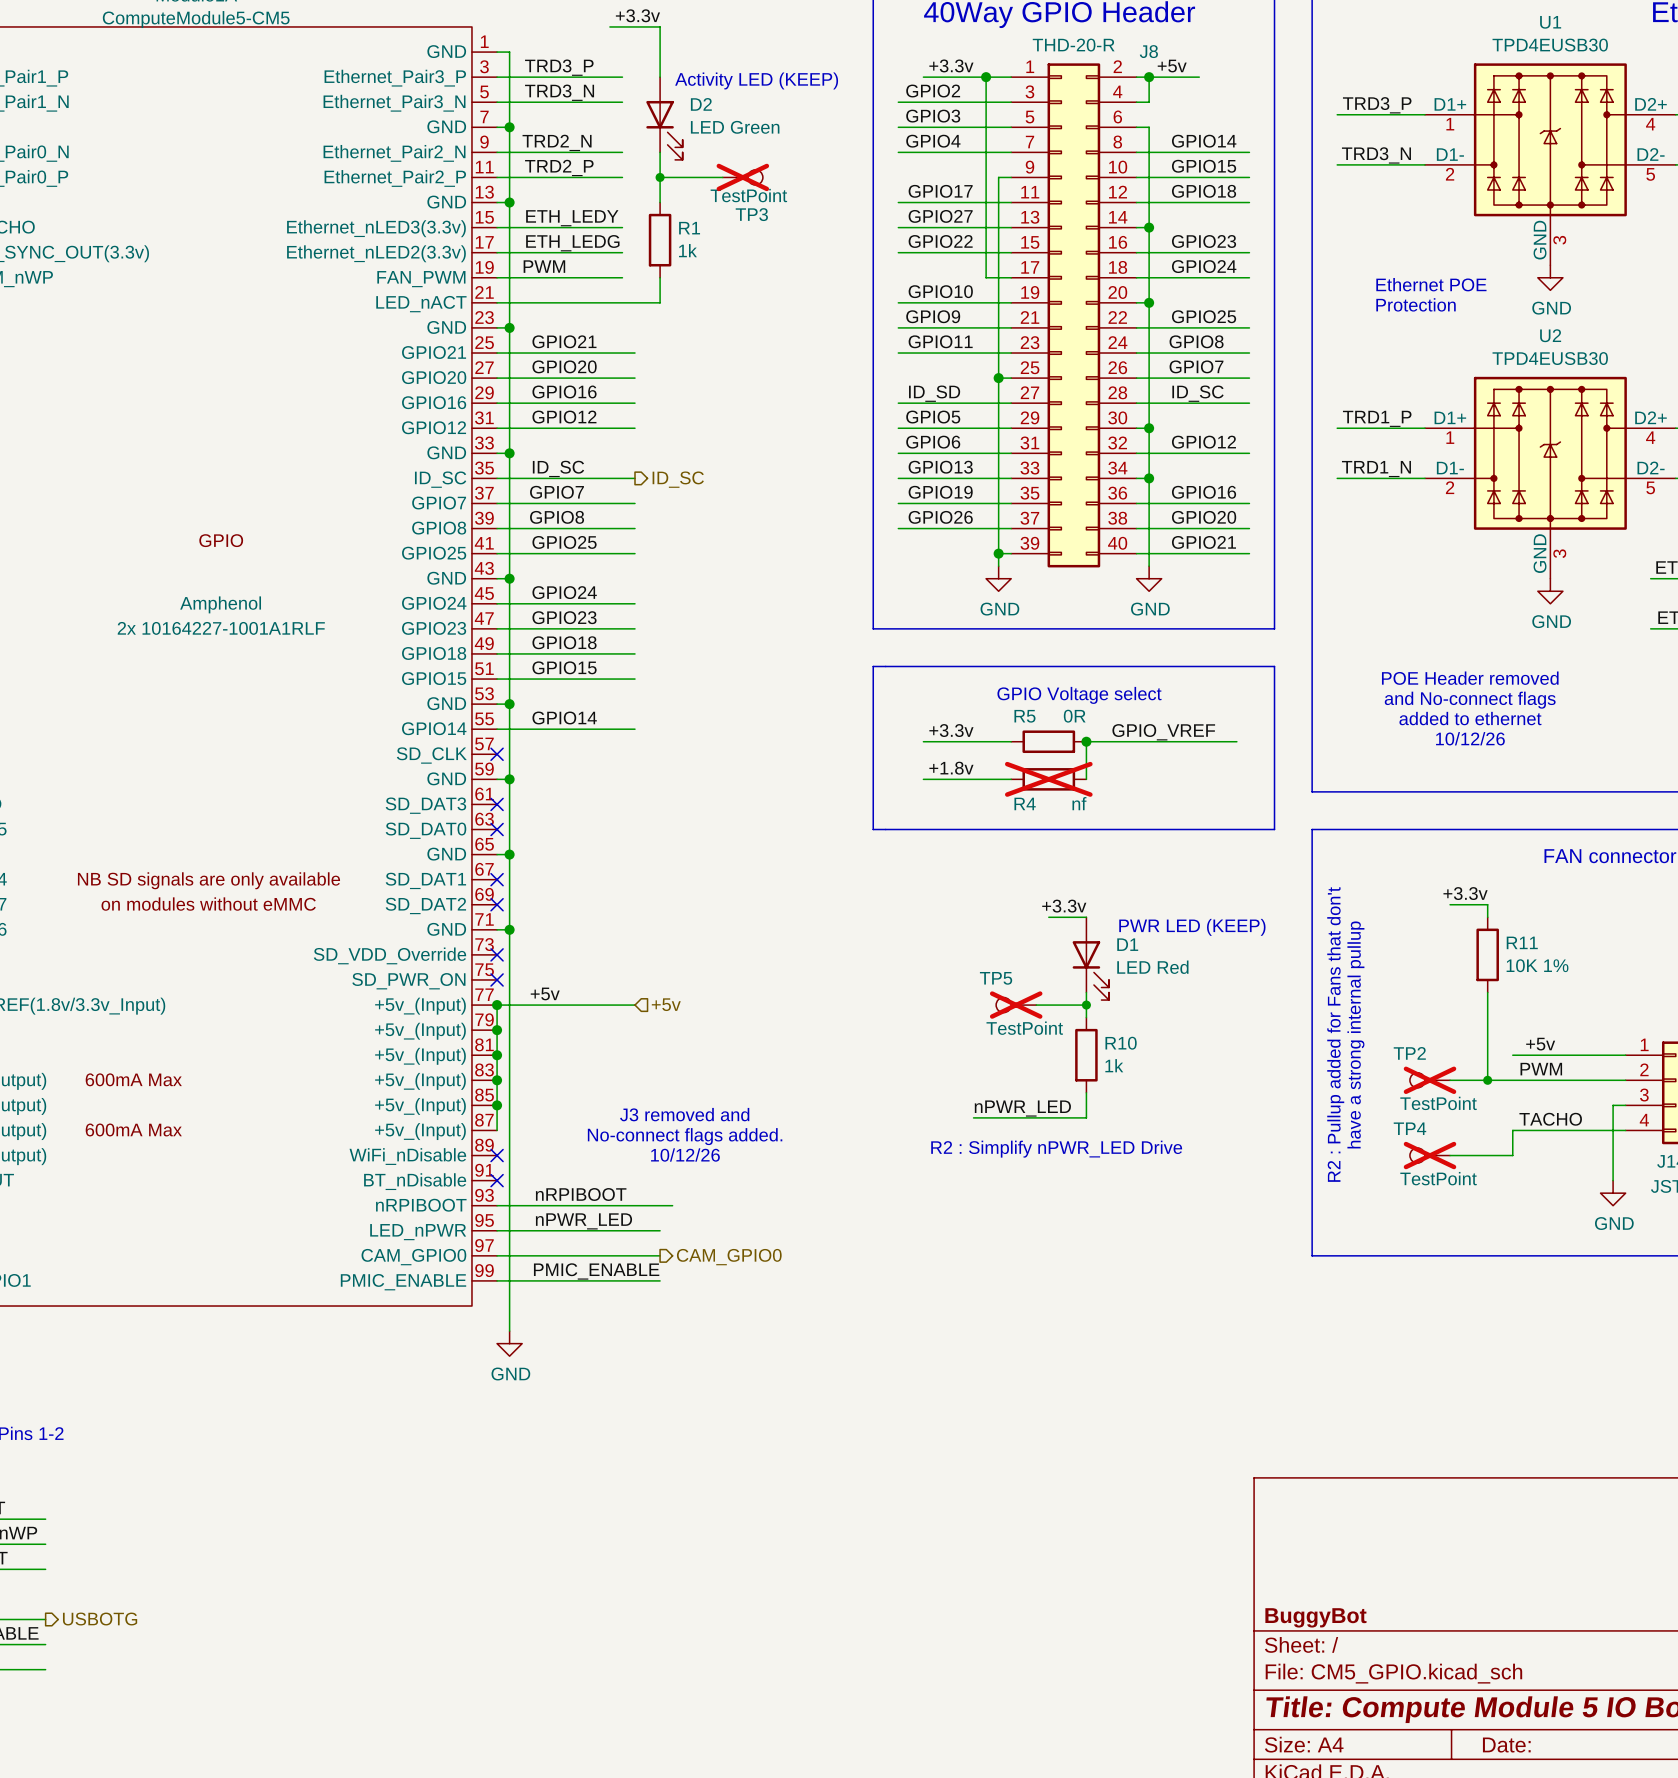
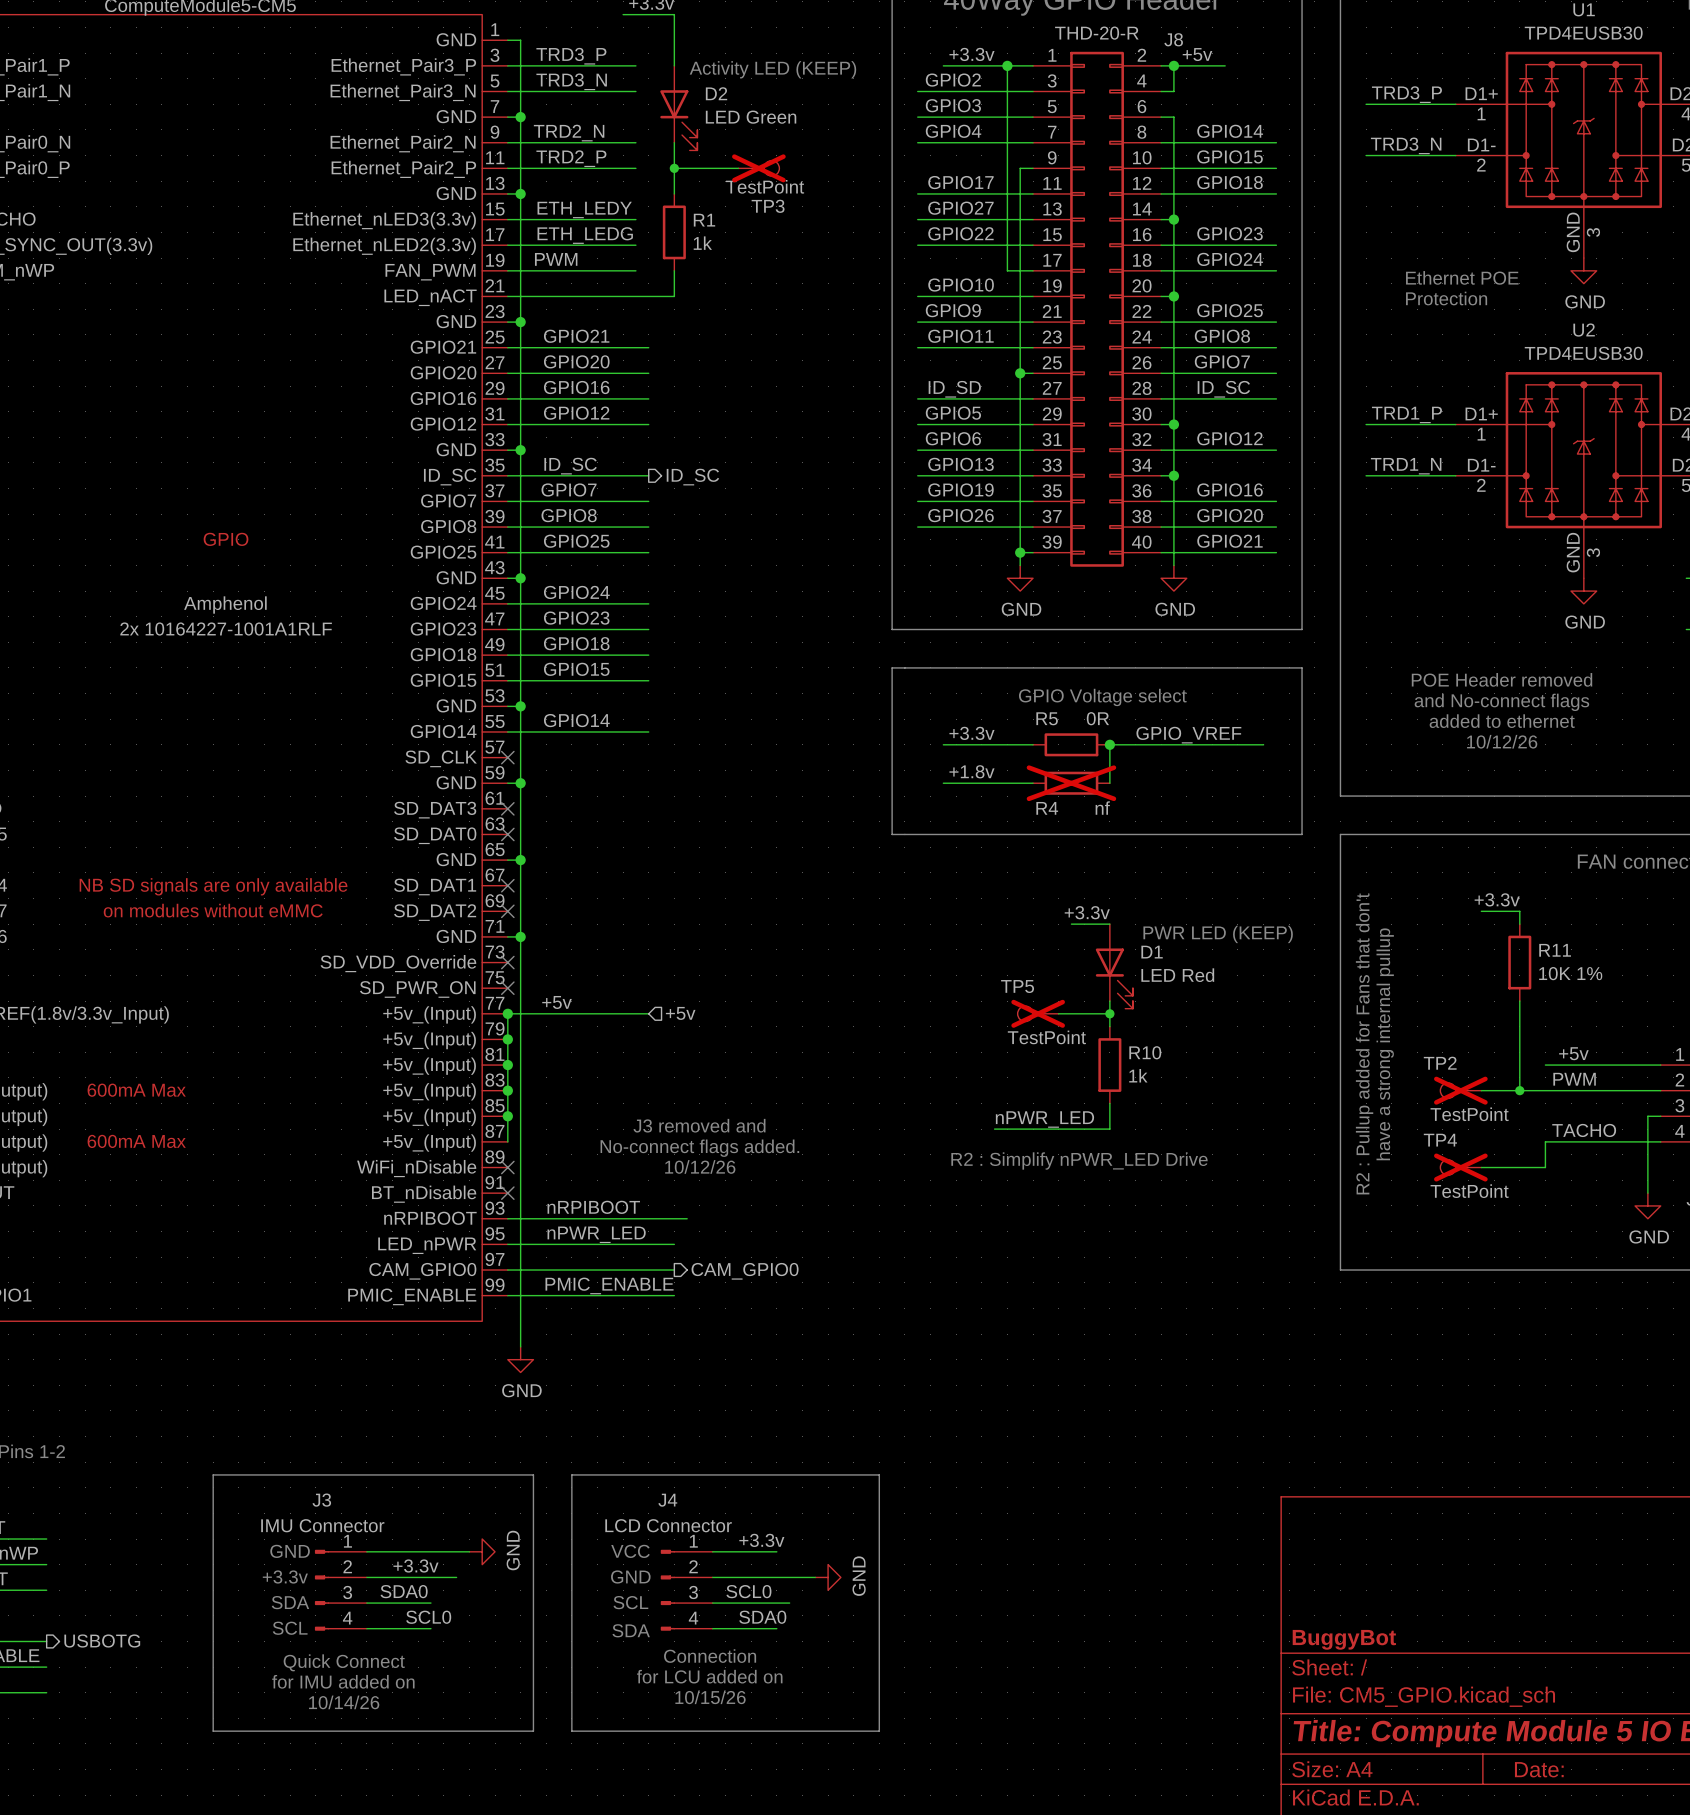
line: none -> (213, 1474) (533, 1474) (533, 1731) (213, 1731) (213, 1474)
line: none -> (571, 1474) (879, 1474) (879, 1731) (571, 1731) (571, 1474)
label: none -> +3.3v (761, 1540)
text: none -> GND (290, 1551)
wire: none -> (366, 1551) (469, 1551)
power symbol: none -> GND (482, 1551)
text: none -> VCC (630, 1551)
wire: none -> (712, 1551) (776, 1551)
label: none -> +3.3v (415, 1566)
text: none -> +3.3v (285, 1576)
wire: none -> (366, 1577) (456, 1577)
text: none -> GND (630, 1576)
wire: none -> (712, 1577) (815, 1577)
power symbol: none -> GND (828, 1577)
J3: none -> IMU Connector (340, 1590)
J4: none -> LCD Connector (686, 1590)
label: none -> SDA0 (404, 1591)
label: none -> SCL0 (748, 1591)
text: none -> SDA (290, 1602)
wire: none -> (366, 1603) (430, 1603)
text: none -> SCL (630, 1602)
wire: none -> (712, 1603) (789, 1603)
label: none -> SCL0 (428, 1617)
label: none -> SDA0 (762, 1617)
text: none -> SCL (290, 1628)
wire: none -> (366, 1628) (430, 1628)
wire: none -> (712, 1628) (776, 1628)
text: none -> SDA (631, 1630)
text: none -> Connection (710, 1656)
text: none -> Quick Connect (344, 1662)
text: none -> for LCU added on (709, 1676)
text: none -> for IMU added on (343, 1681)
text: none -> 10/15/26 (710, 1697)
text: none -> 10/14/26 (344, 1702)

